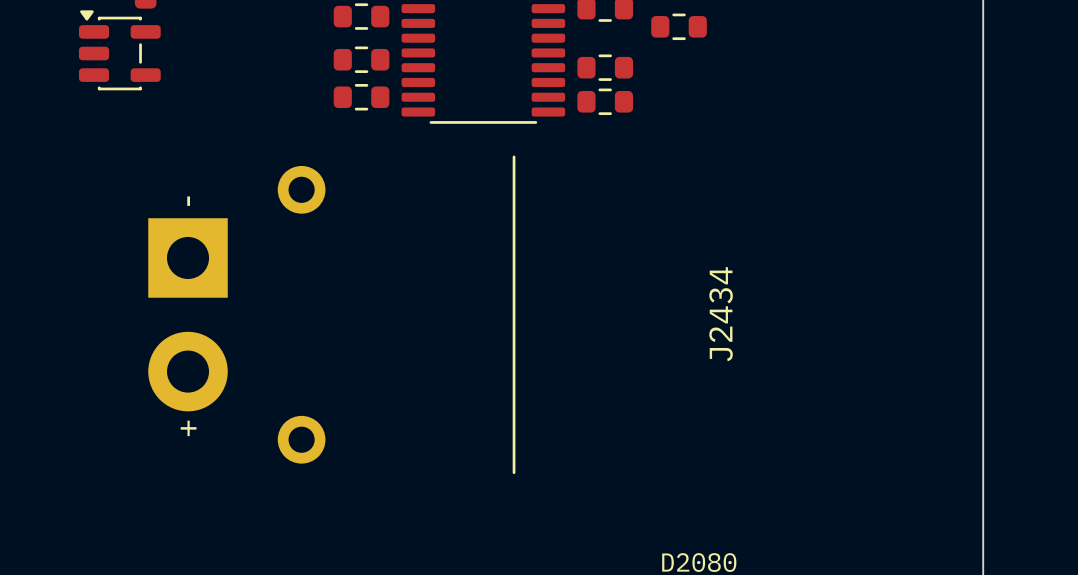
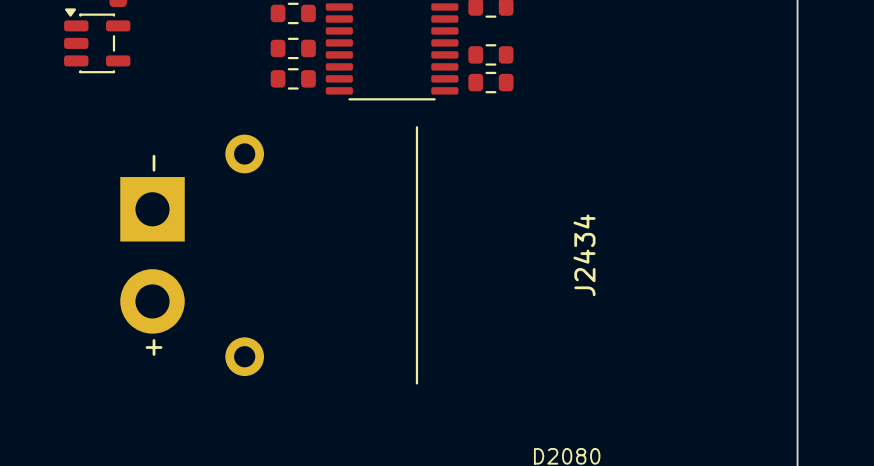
part: (679, 26) -> none

